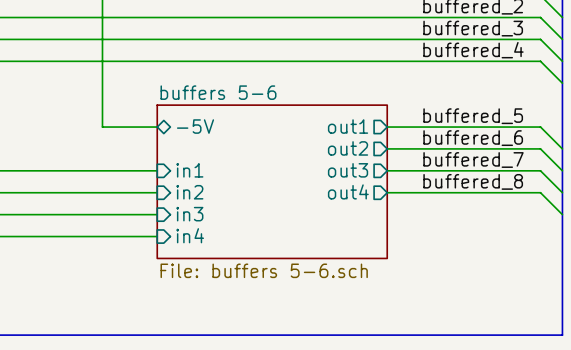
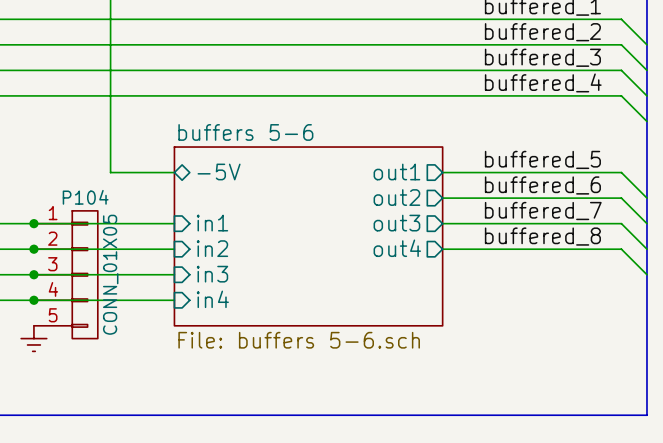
junction: none -> (33, 223)
junction: none -> (33, 249)
junction: none -> (33, 274)
P104: none -> CONN_01X05 (65, 274)
junction: none -> (33, 300)
power symbol: none -> (33, 338)

